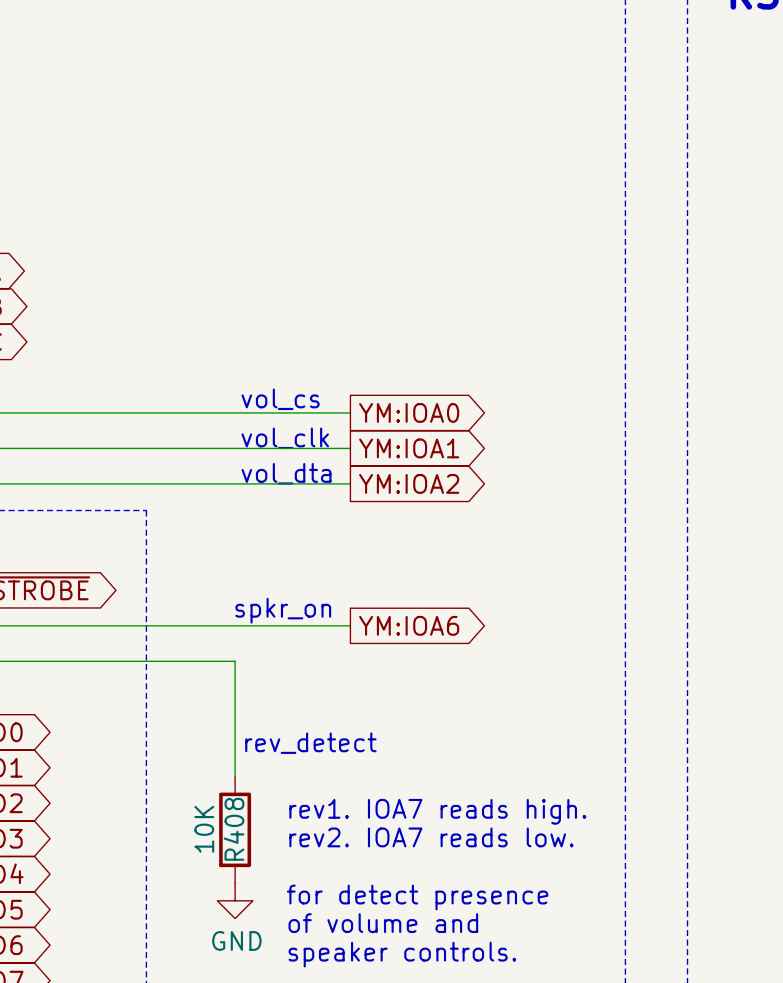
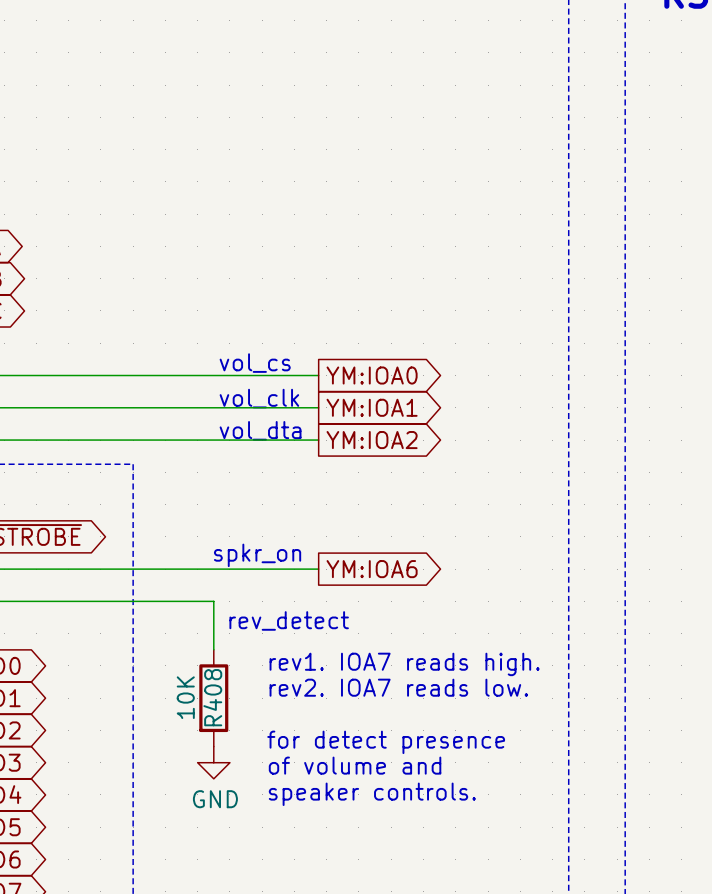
wire: (235, 714) (235, 776) -> none
text: none -> rev1. IOA7 reads high. (404, 664)
text position: rev_detect (310, 743) -> rev_detect (289, 620)
text: none -> rev2. IOA7 reads low. (398, 687)
text: rev1. IOA7 reads high. (437, 811) -> for detect presence (386, 742)
R408 position: (235, 829) -> (213, 698)
text: rev2. IOA7 reads low. (431, 837) -> of volume and (355, 765)
text: for detect presence (417, 897) -> none
power symbol position: GND (235, 900) -> GND (213, 762)
text: of volume and (383, 923) -> none
text position: speaker controls. (402, 954) -> speaker controls. (372, 794)

